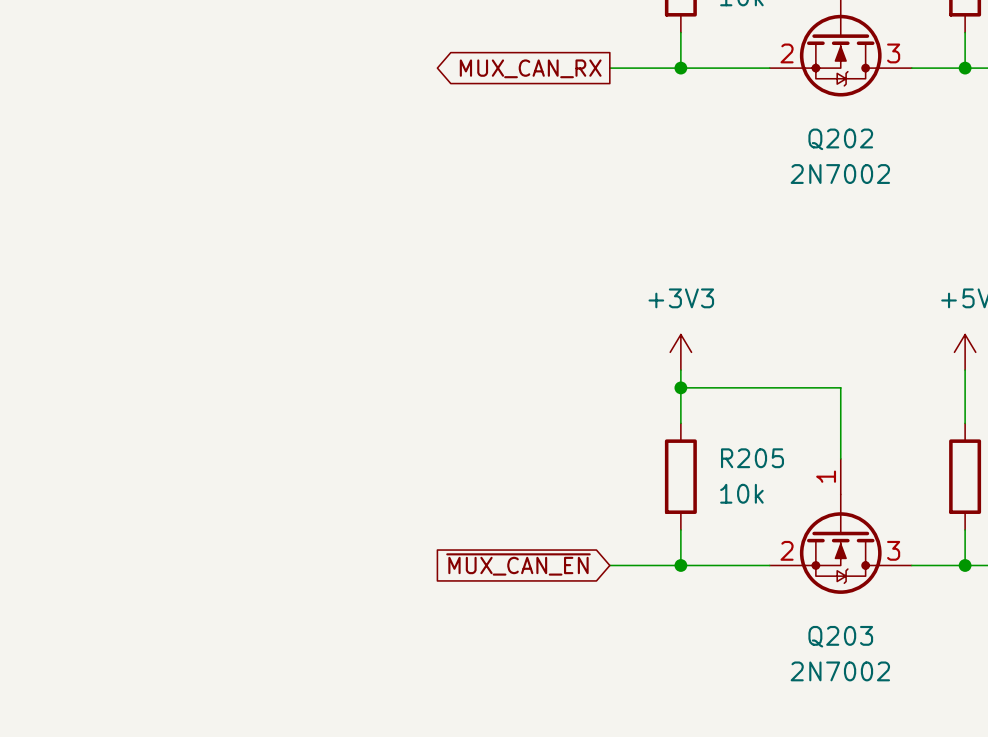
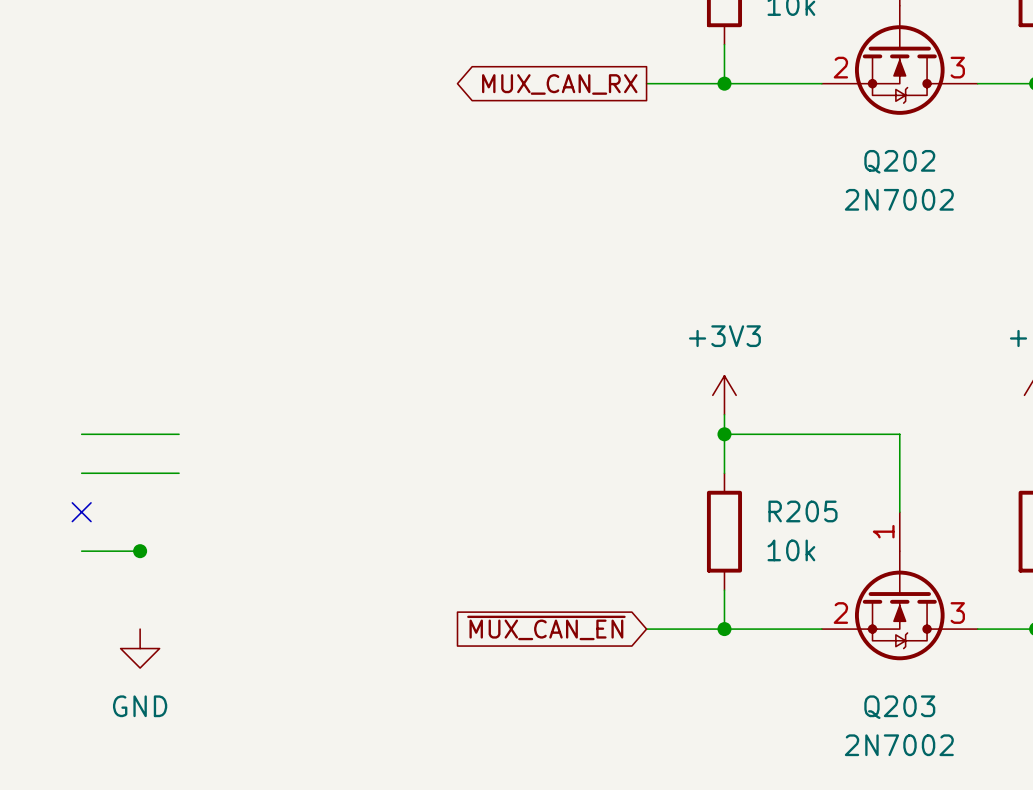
wire: none -> (81, 434) (179, 434)
wire: none -> (81, 473) (179, 473)
no-connect mark: none -> (81, 512)
wire: none -> (81, 551) (140, 551)
junction: none -> (140, 551)
power symbol: none -> GND (140, 648)

